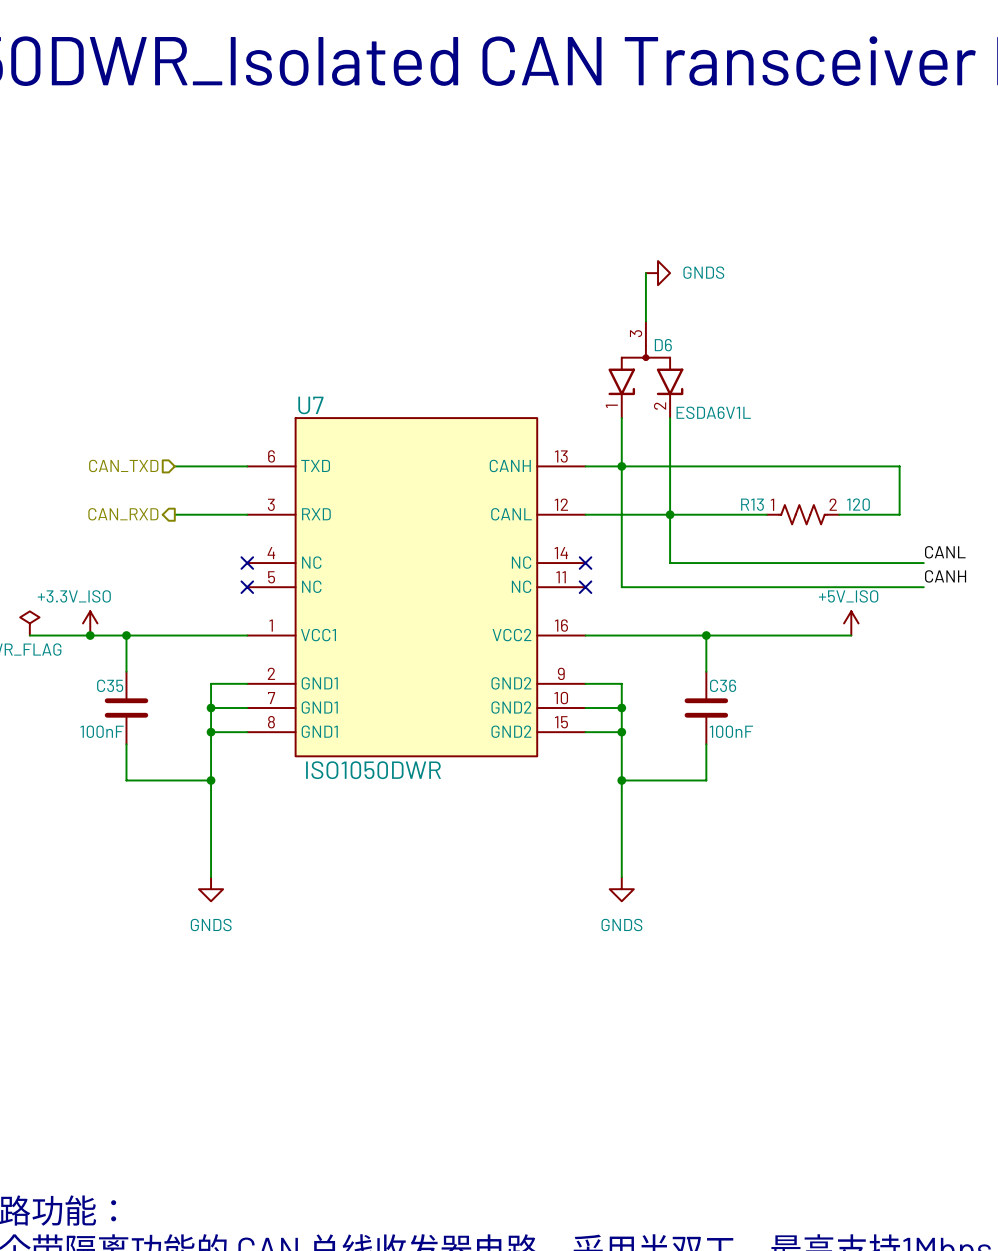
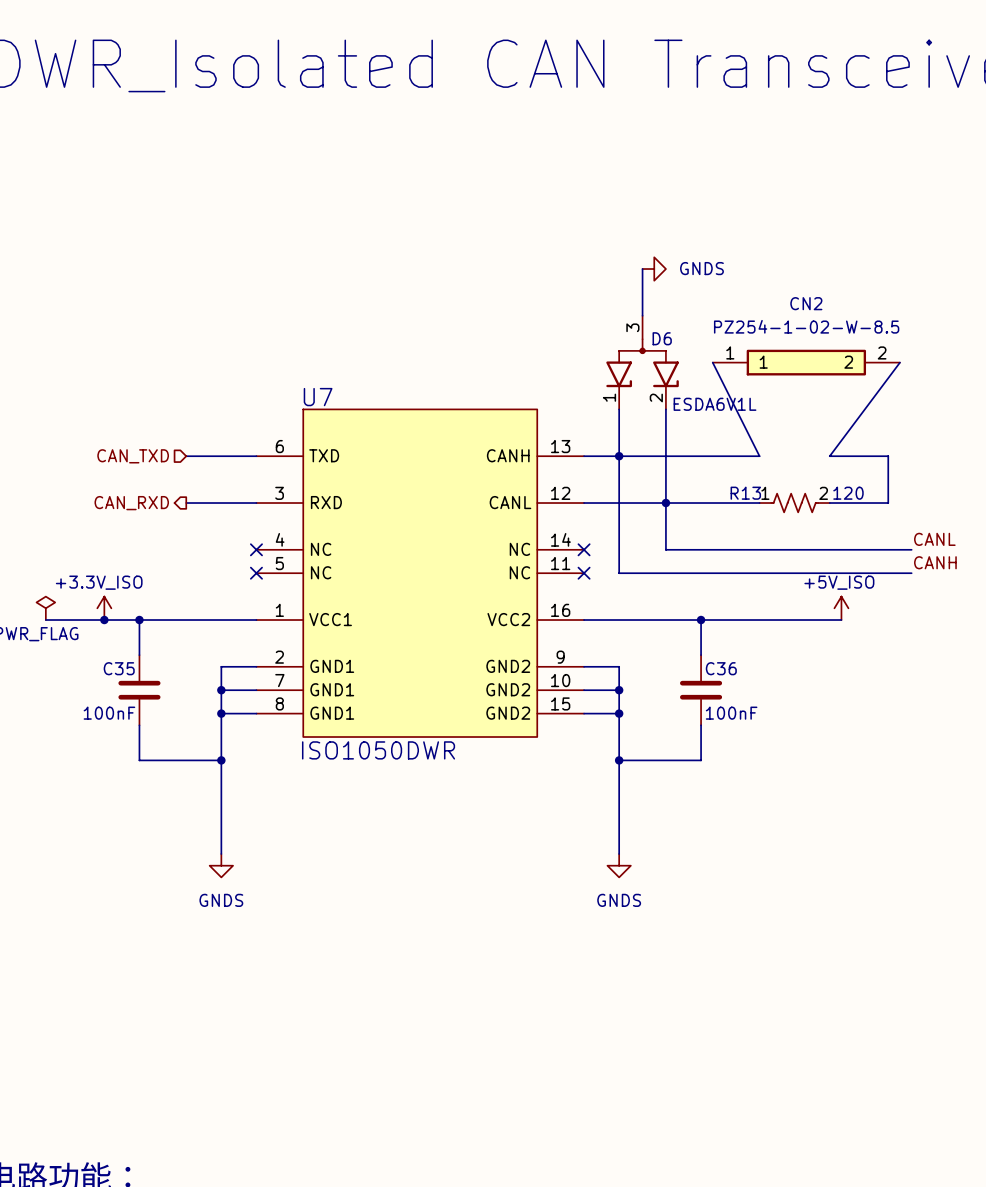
CN2: none -> PZ254-1-02-W-8.5 (806, 362)
wire: none -> (899, 362) (829, 456)
wire: (766, 466) (839, 466) -> (759, 456) (712, 362)

